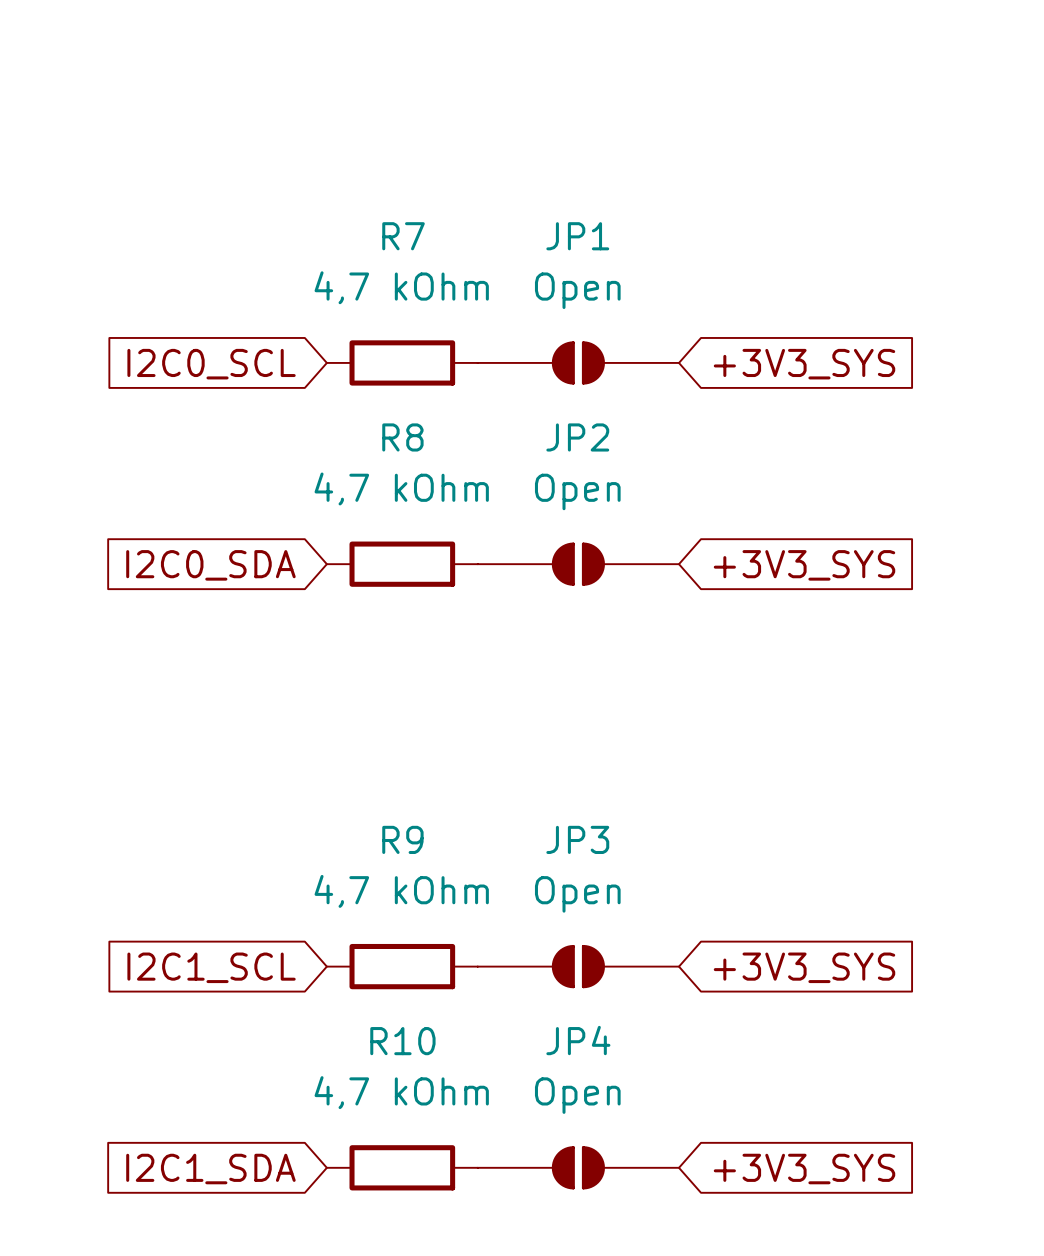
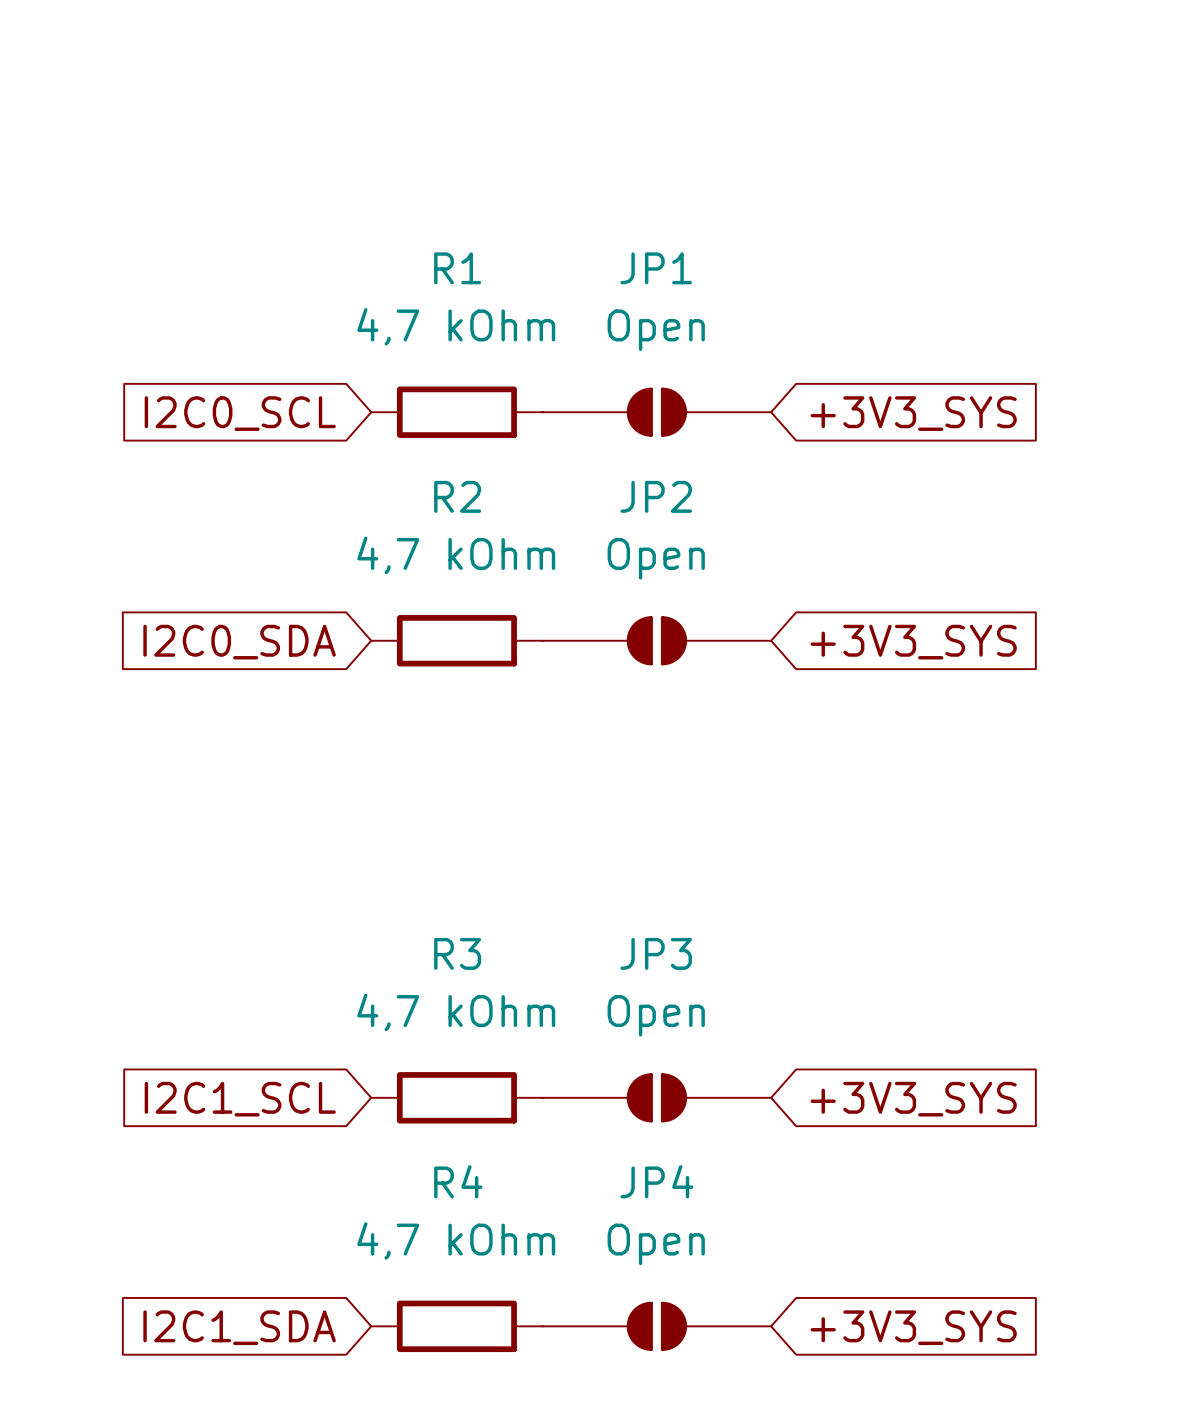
R7 name: R7 (403, 236) -> R1 (457, 268)
R8 name: R8 (402, 437) -> R2 (457, 496)
R9 name: R9 (402, 839) -> R3 (457, 953)
R10 name: R10 (402, 1041) -> R4 (458, 1181)

